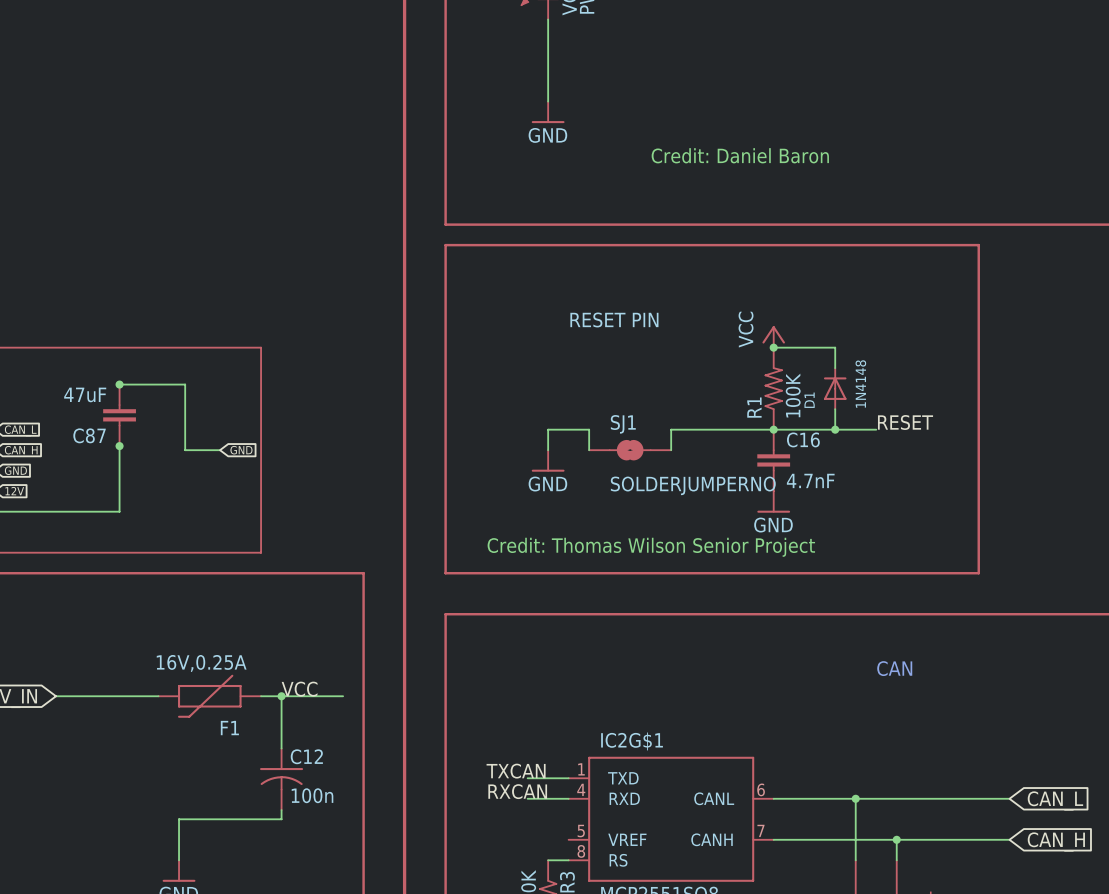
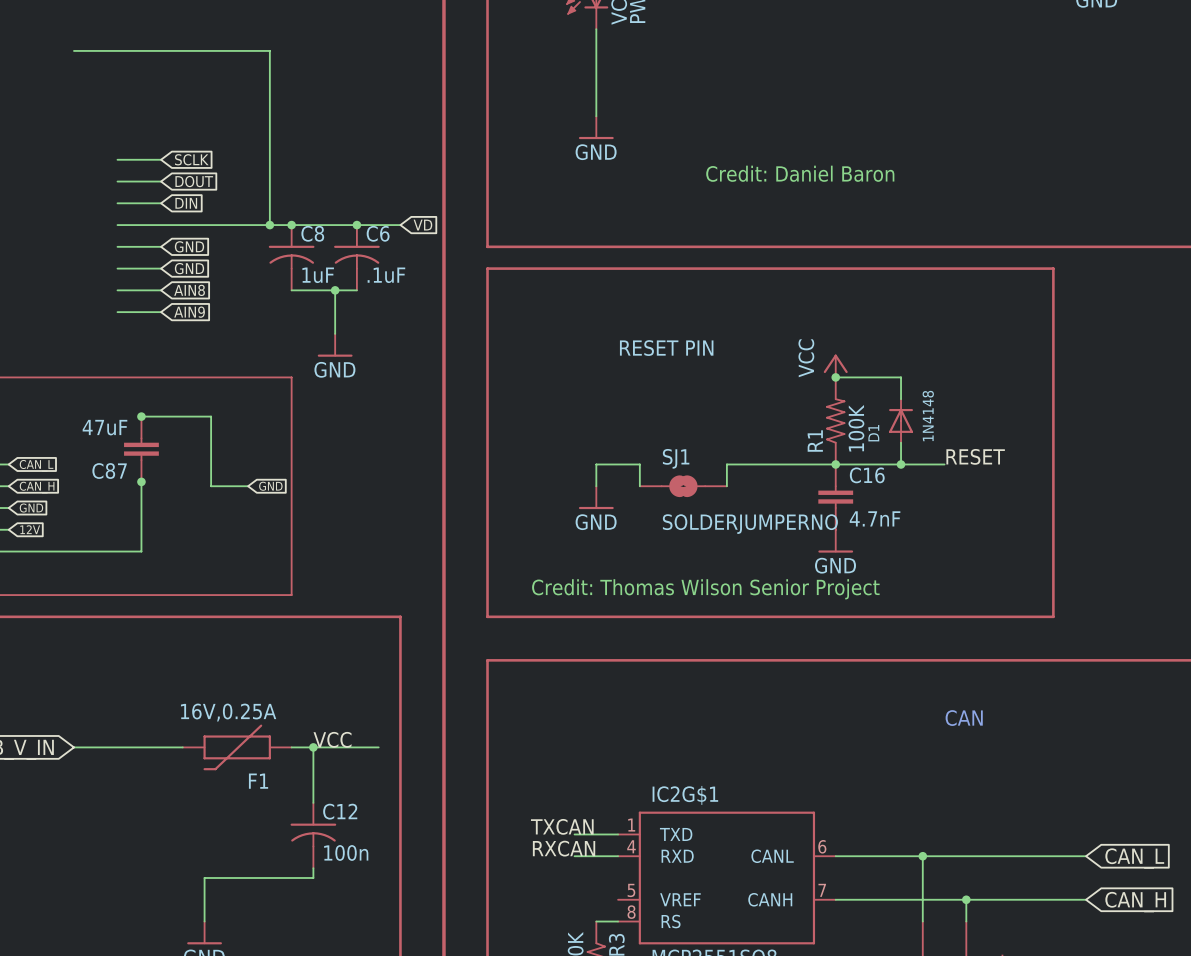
wire: none -> (73, 50) (269, 50) (269, 225)
wire: none -> (117, 159) (161, 159)
global label: none -> SCLK (191, 159)
wire: none -> (117, 181) (161, 181)
global label: none -> DOUT (194, 181)
wire: none -> (117, 203) (161, 203)
global label: none -> DIN (186, 203)
wire: none -> (117, 225) (400, 225)
junction: none -> (269, 225)
junction: none -> (291, 225)
junction: none -> (356, 225)
global label: none -> VD (422, 225)
wire: none -> (117, 246) (161, 246)
global label: none -> GND (189, 246)
C8: none -> 1uF (291, 257)
C6: none -> .1uF (356, 257)
wire: none -> (117, 268) (161, 268)
global label: none -> GND (189, 268)
wire: none -> (117, 290) (161, 290)
global label: none -> AIN8 (189, 290)
wire: none -> (291, 290) (356, 290)
wire: none -> (335, 290) (335, 333)
junction: none -> (335, 290)
wire: none -> (117, 312) (161, 312)
global label: none -> AIN9 (189, 312)
power symbol: none -> GND (335, 345)

